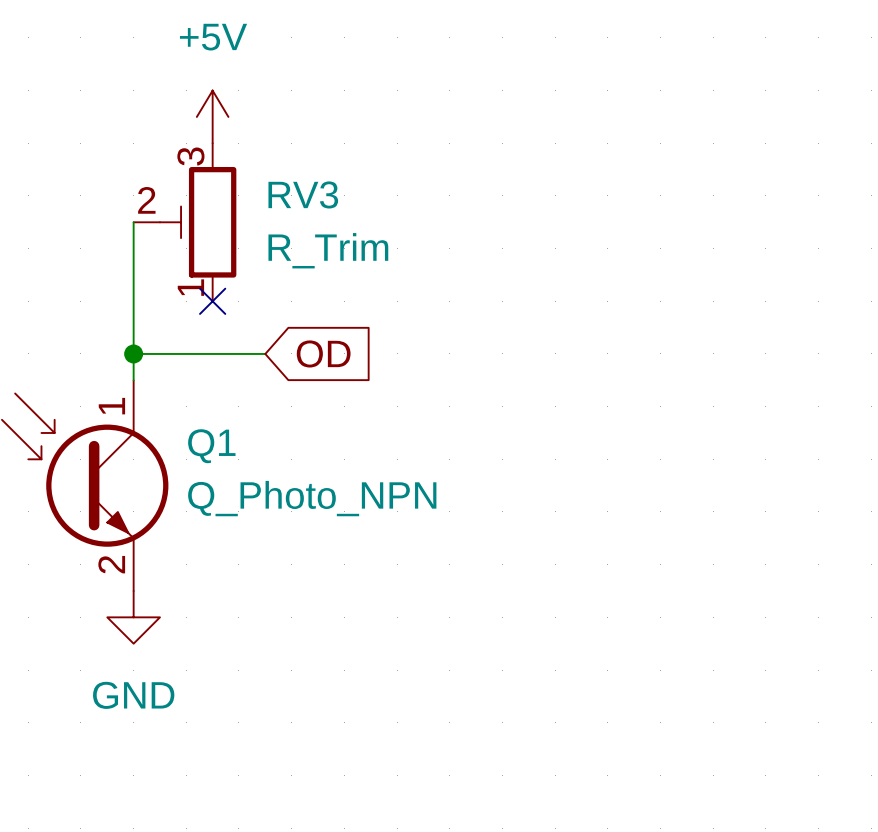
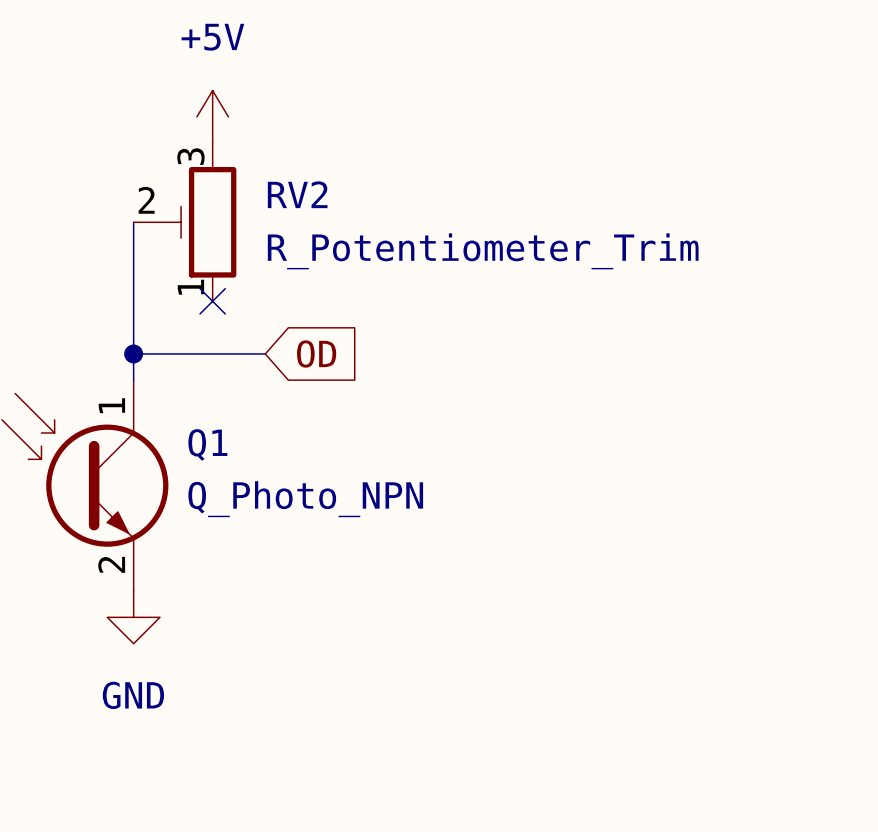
RV3 name: RV3 (303, 194) -> RV2 (297, 194)
RV3 value: R_Trim (328, 250) -> R_Potentiometer_Trim (483, 251)

